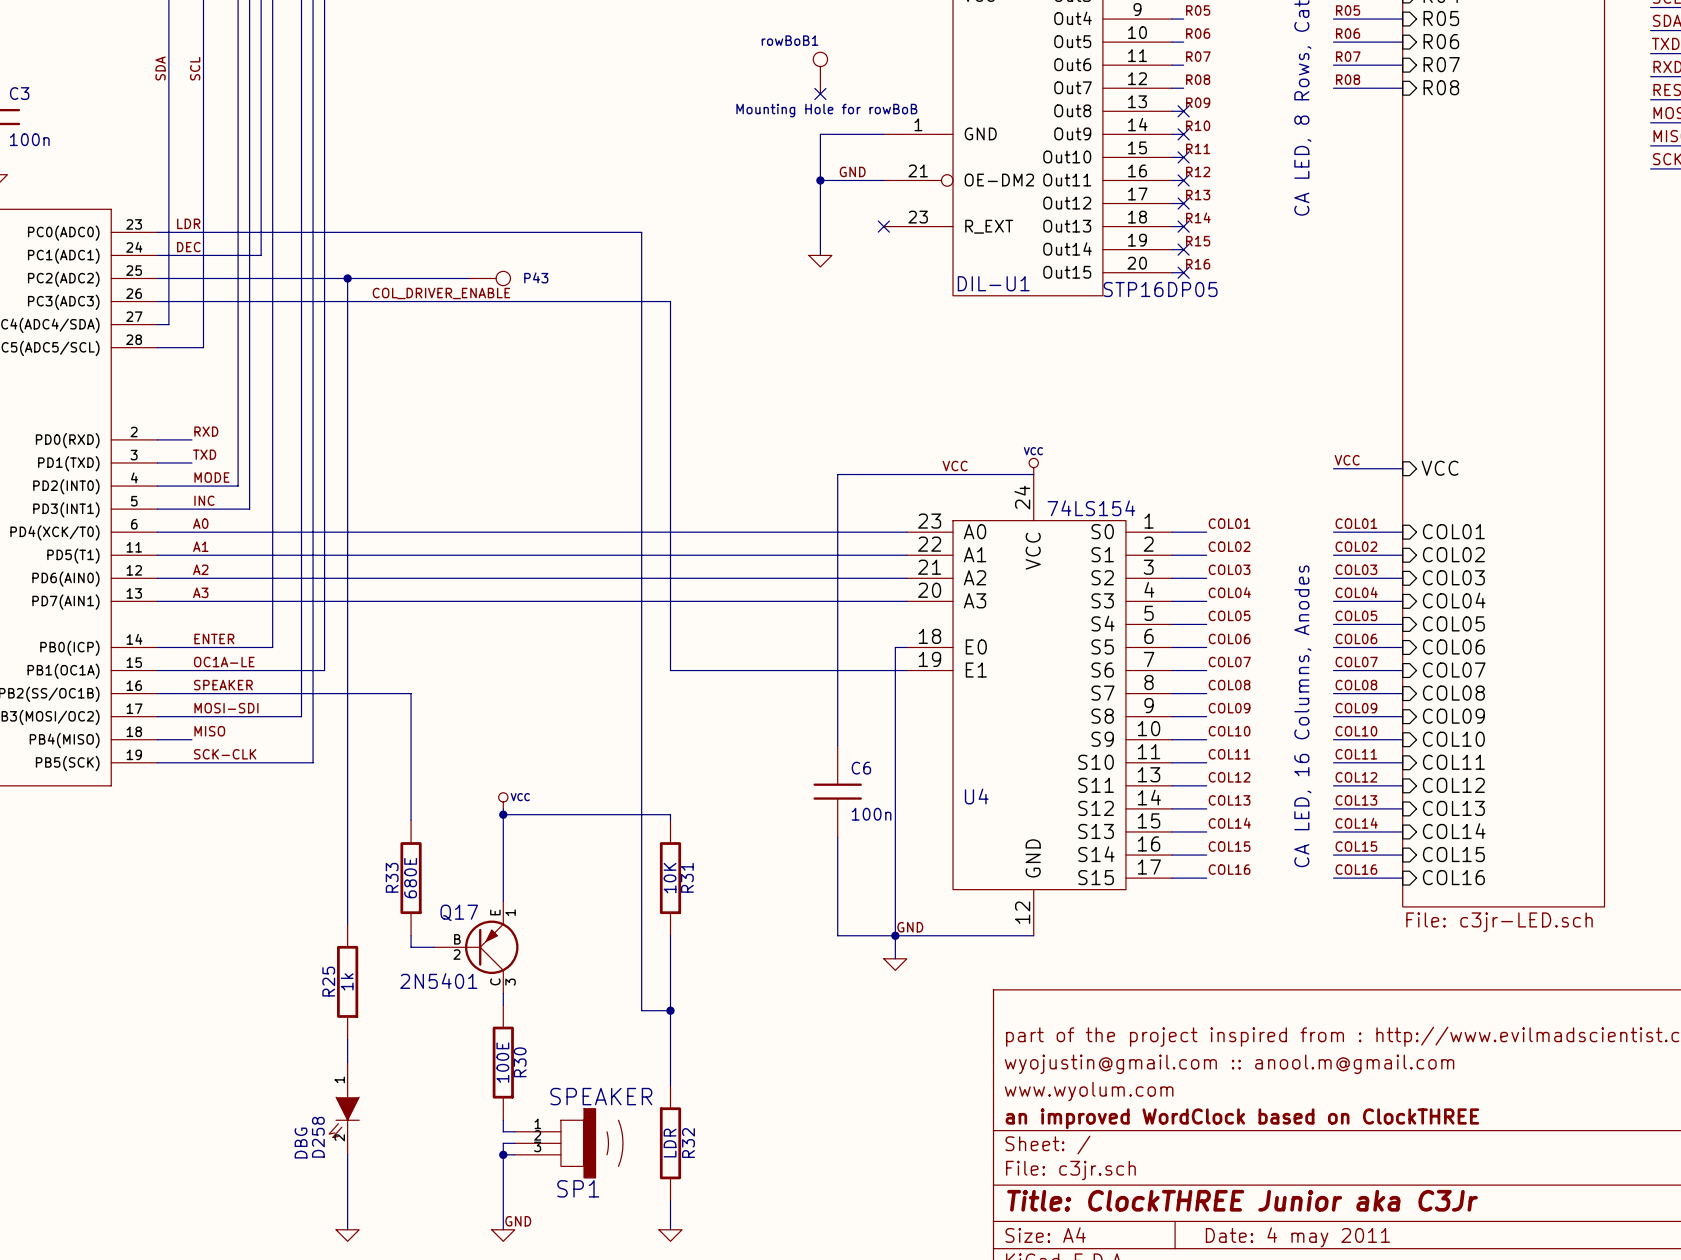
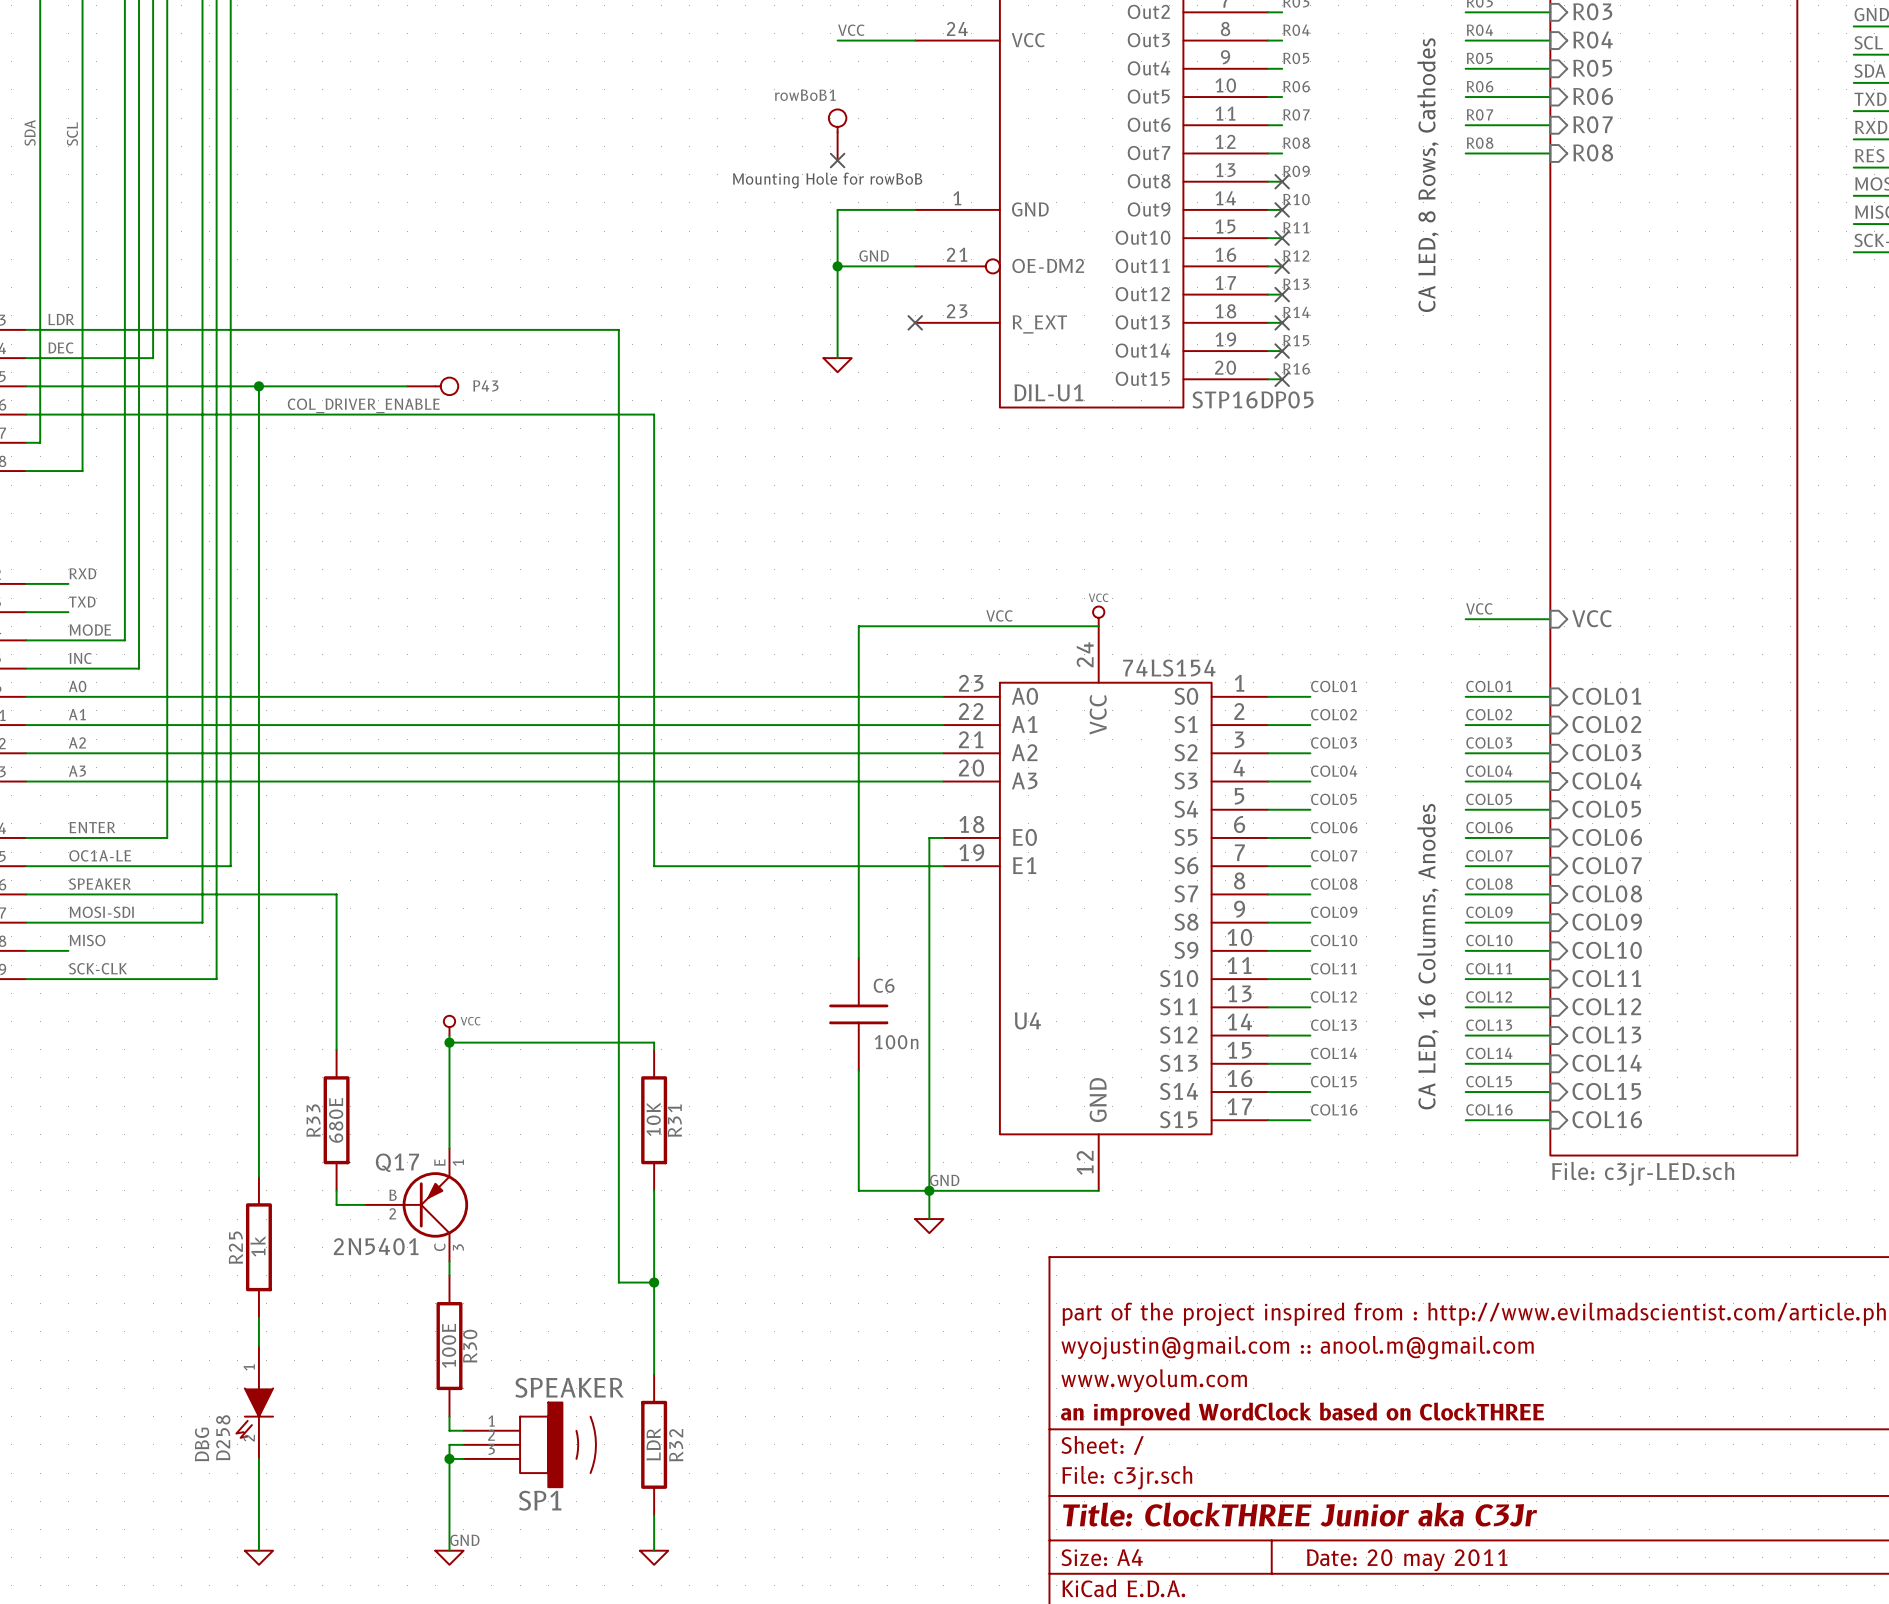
title block: Date: 4 may 2011 (1297, 1237) -> Date: 20 may 2011 (1407, 1560)

